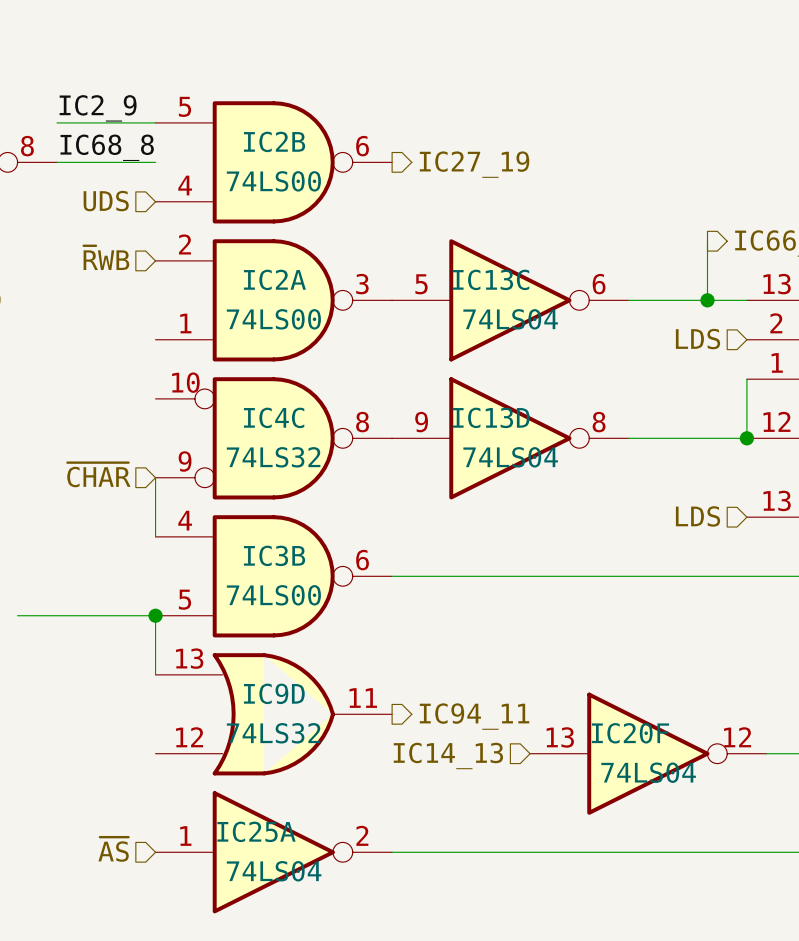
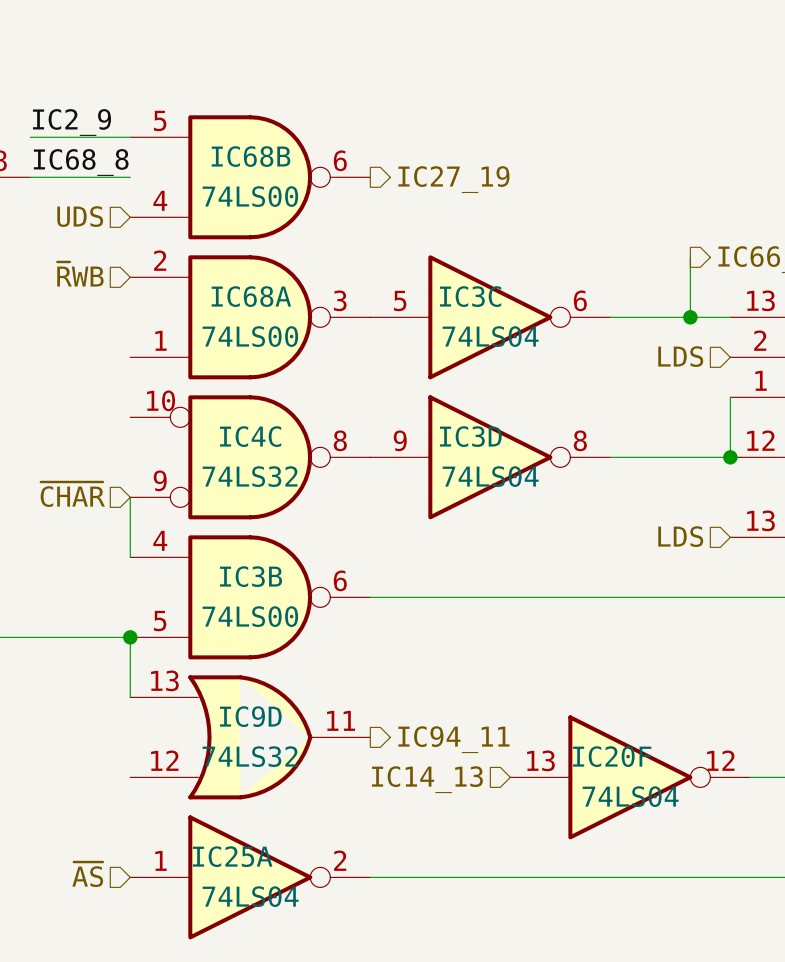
IC2B name: IC2B (274, 141) -> IC68B (251, 156)
IC2A name: IC2A (274, 279) -> IC68A (251, 296)
IC13C name: IC13C (490, 279) -> IC3C (470, 296)
IC13D name: IC13D (491, 417) -> IC3D (470, 436)

